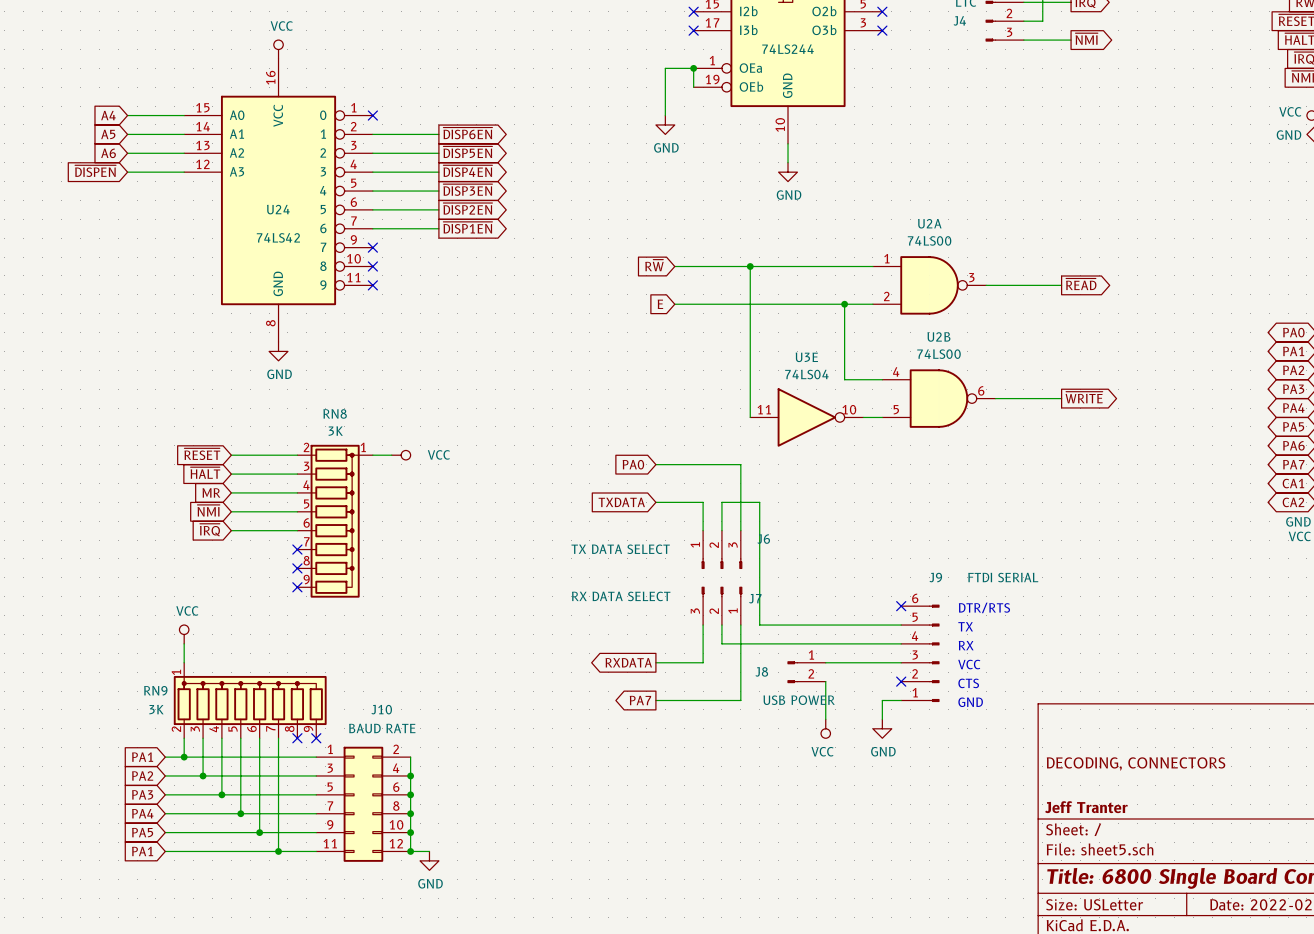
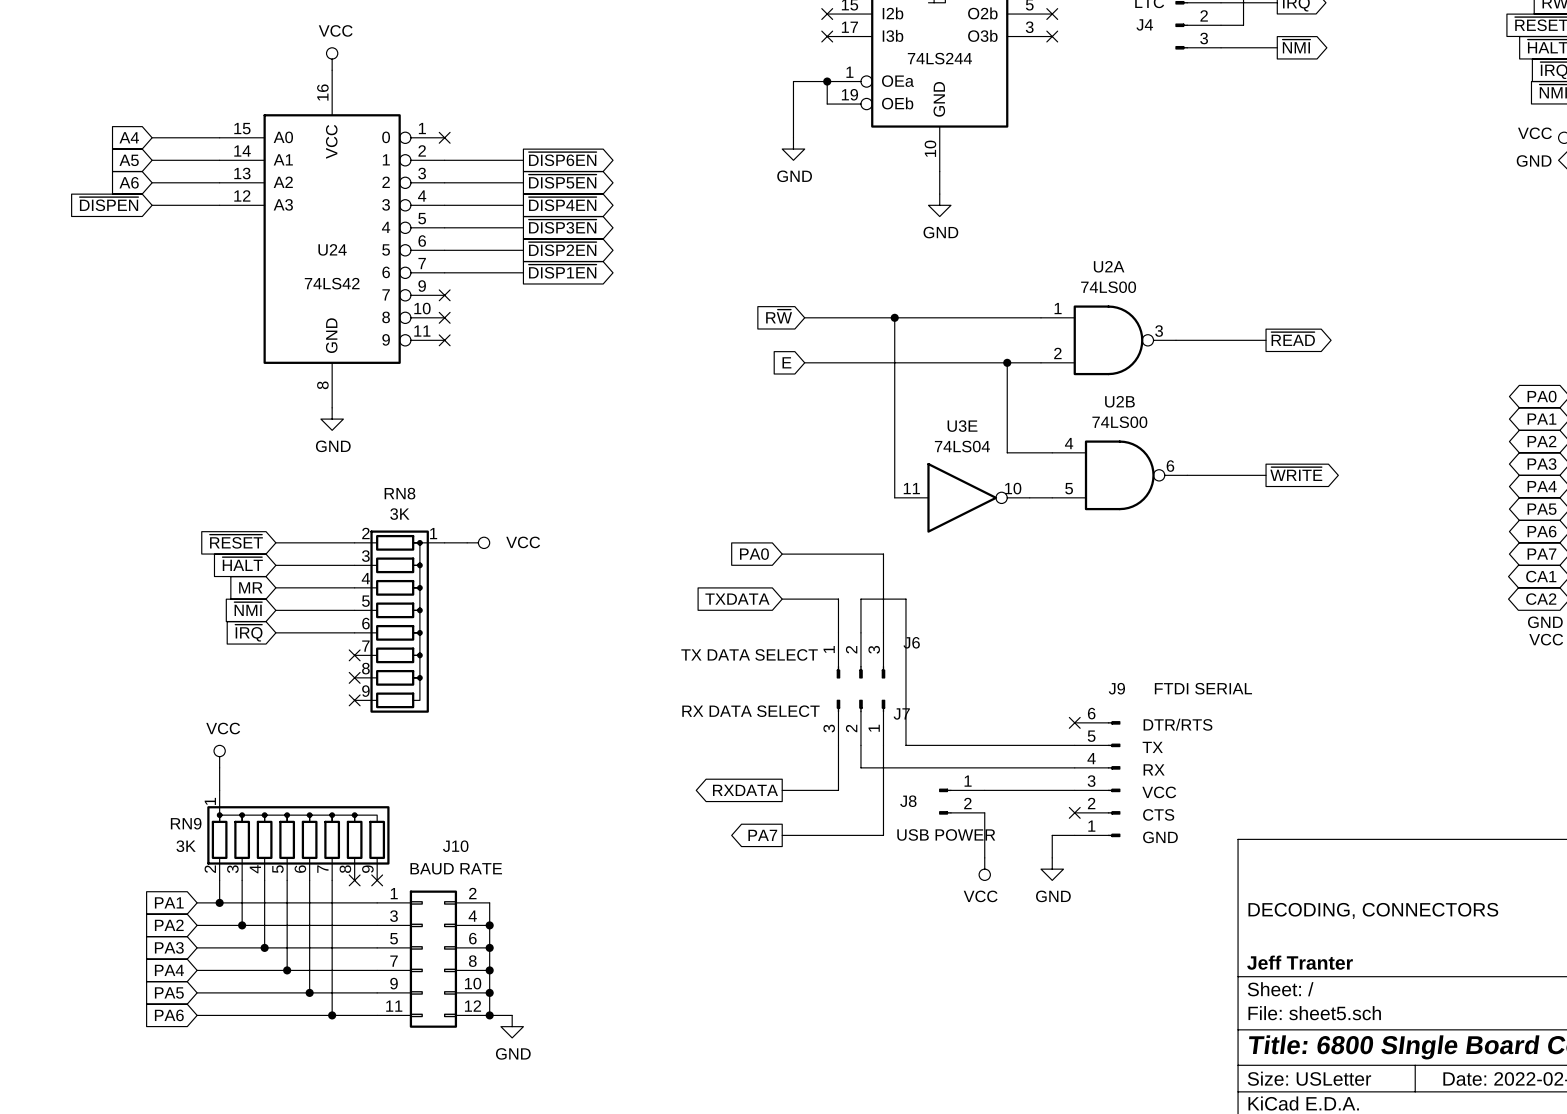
global label: PA1 (142, 851) -> PA6 (169, 1015)

